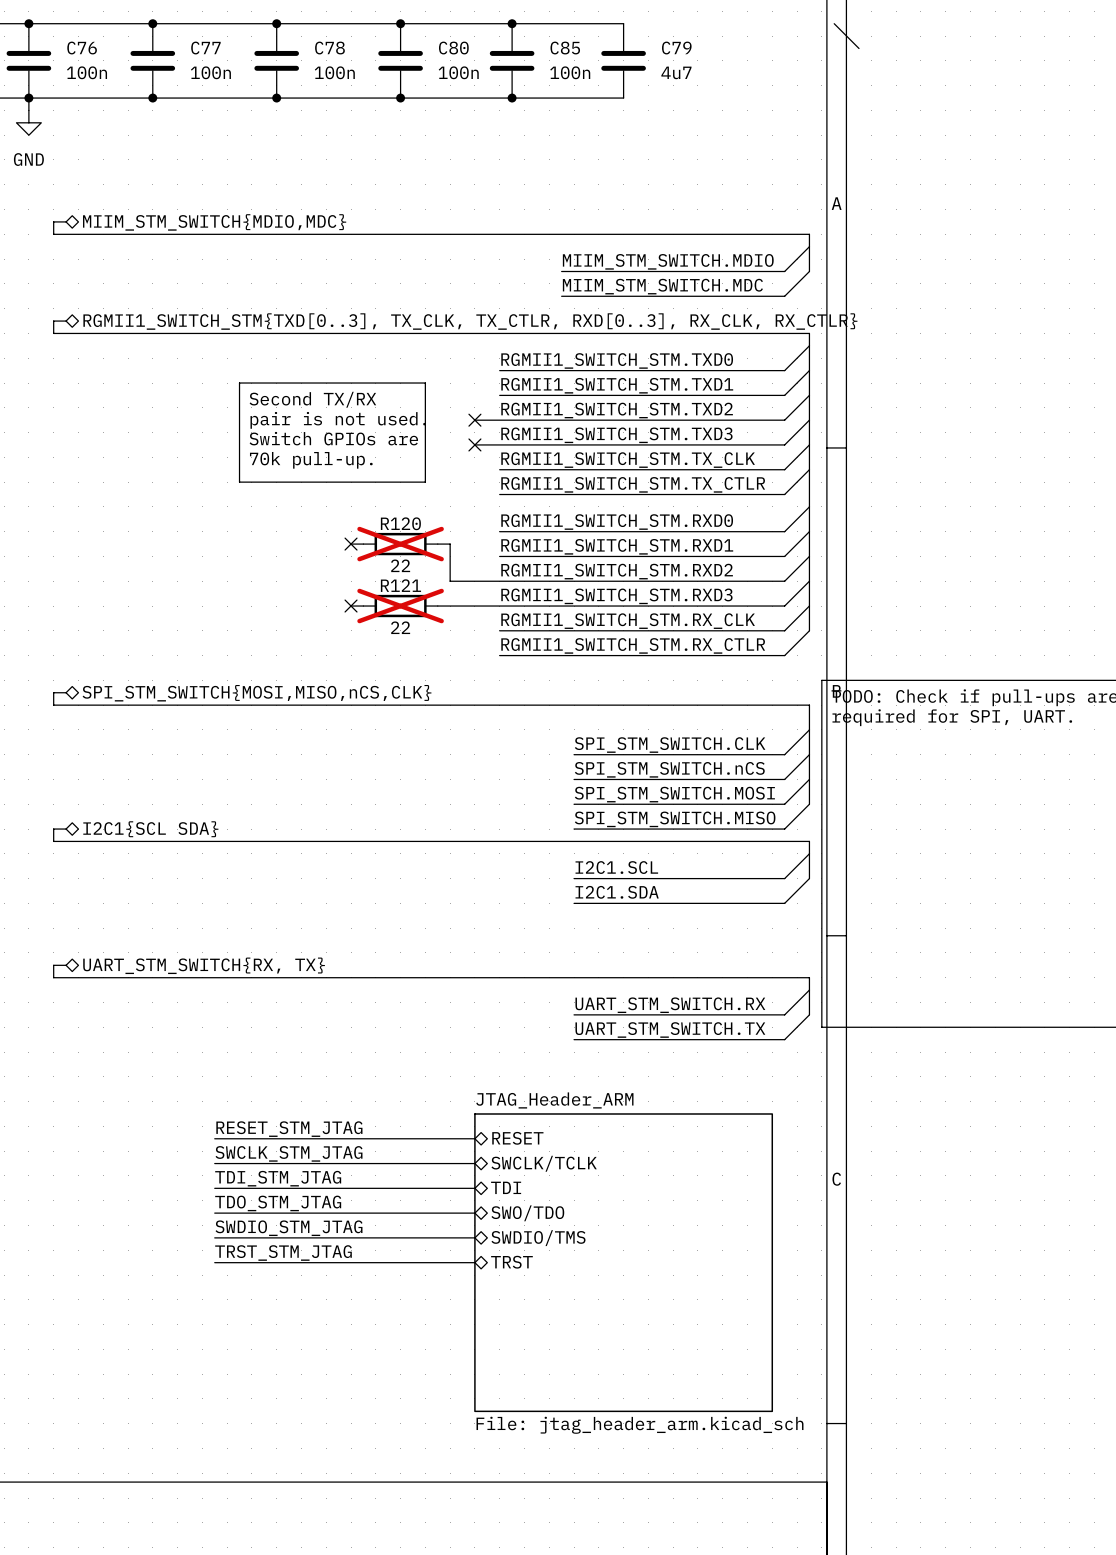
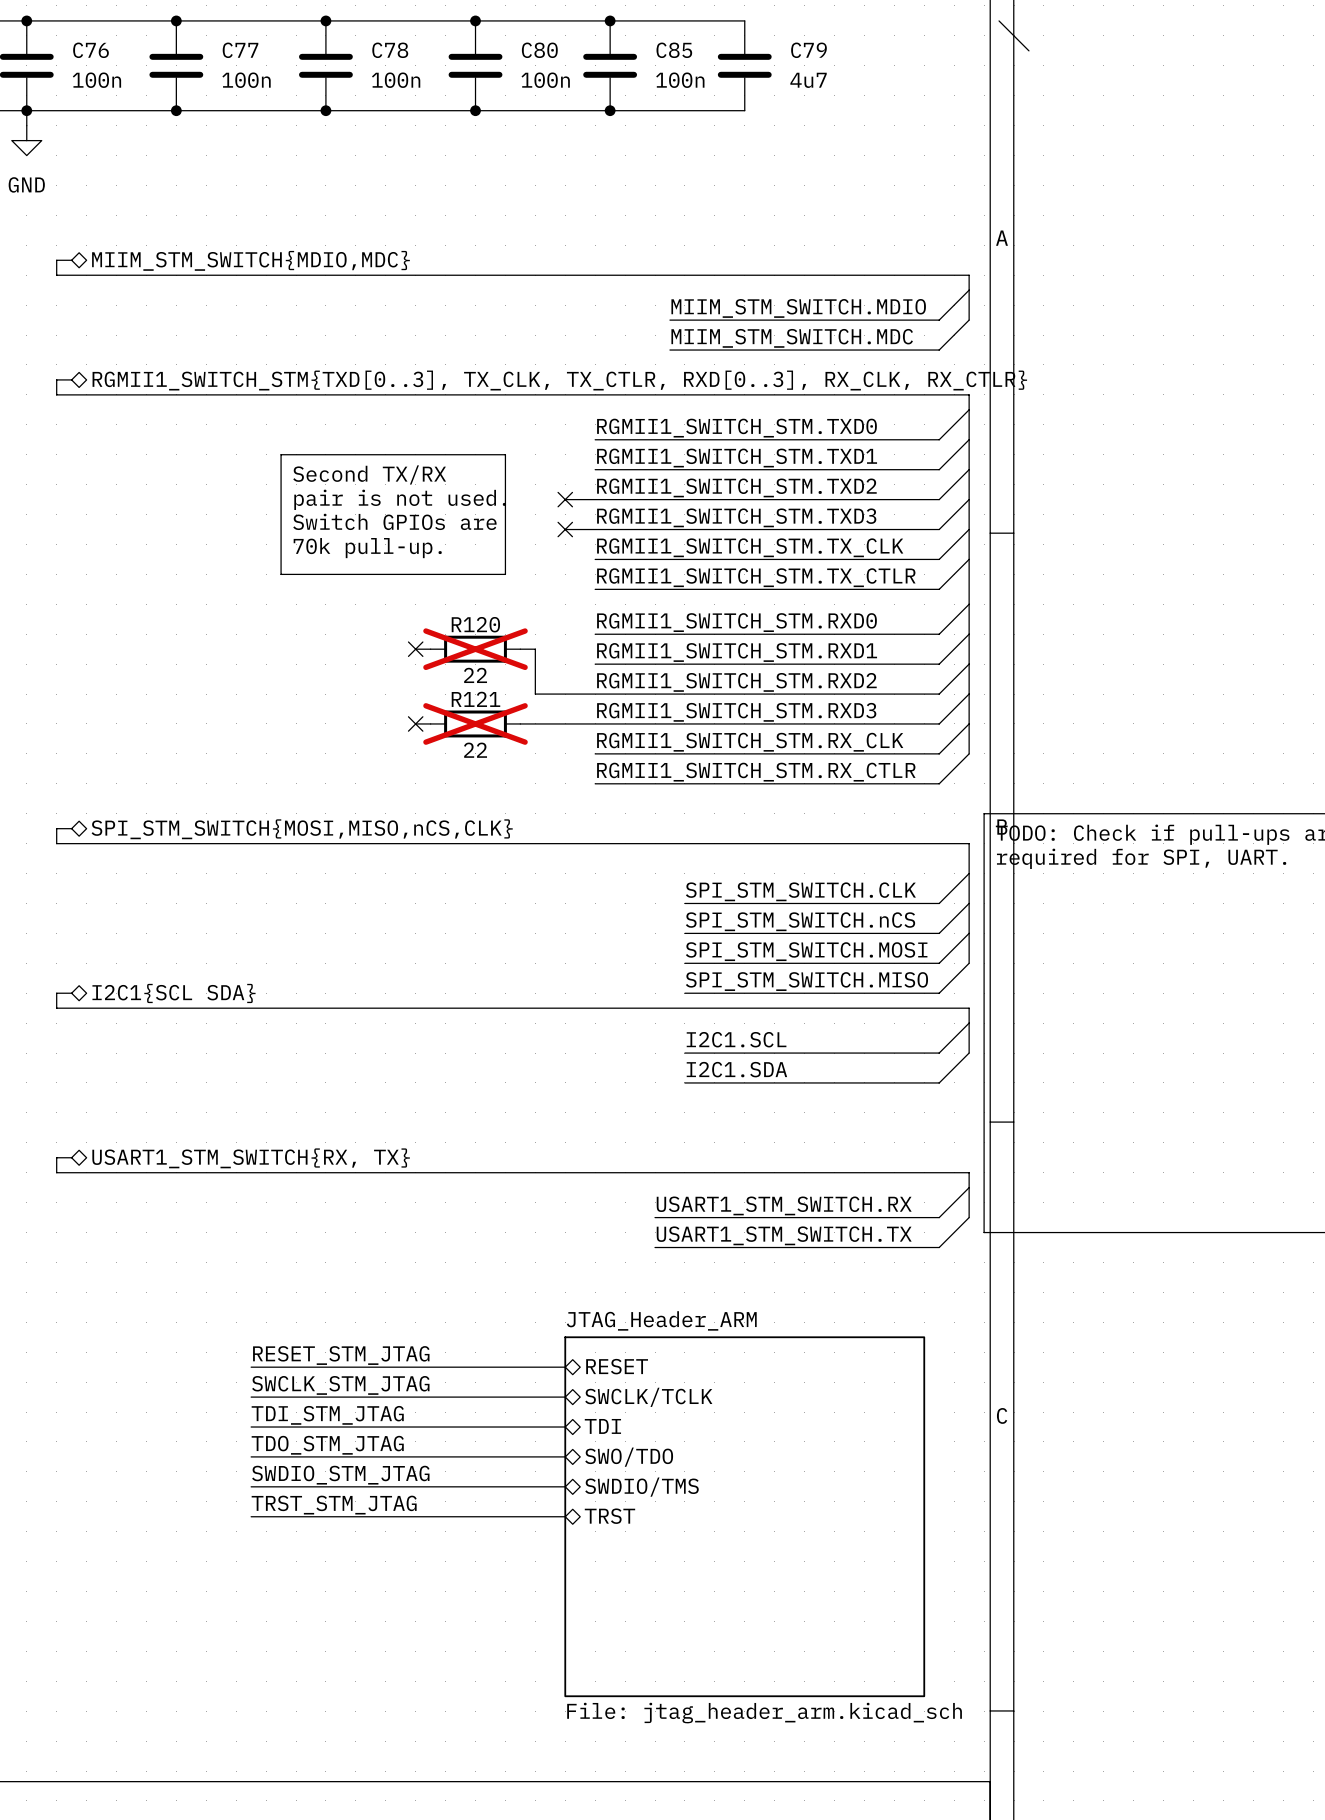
hierarchical label: UART_STM_SWITCH{RX, TX} (204, 965) -> USART1_STM_SWITCH{RX, TX} (251, 1158)
label: none -> USART1_STM_SWITCH.RX (784, 1205)
label: UART_STM_SWITCH.RX (670, 1005) -> none
wire: none -> (655, 1217) (684, 1217)
label: none -> USART1_STM_SWITCH.TX (784, 1235)
label: UART_STM_SWITCH.TX (670, 1029) -> none
wire: none -> (655, 1247) (684, 1247)

